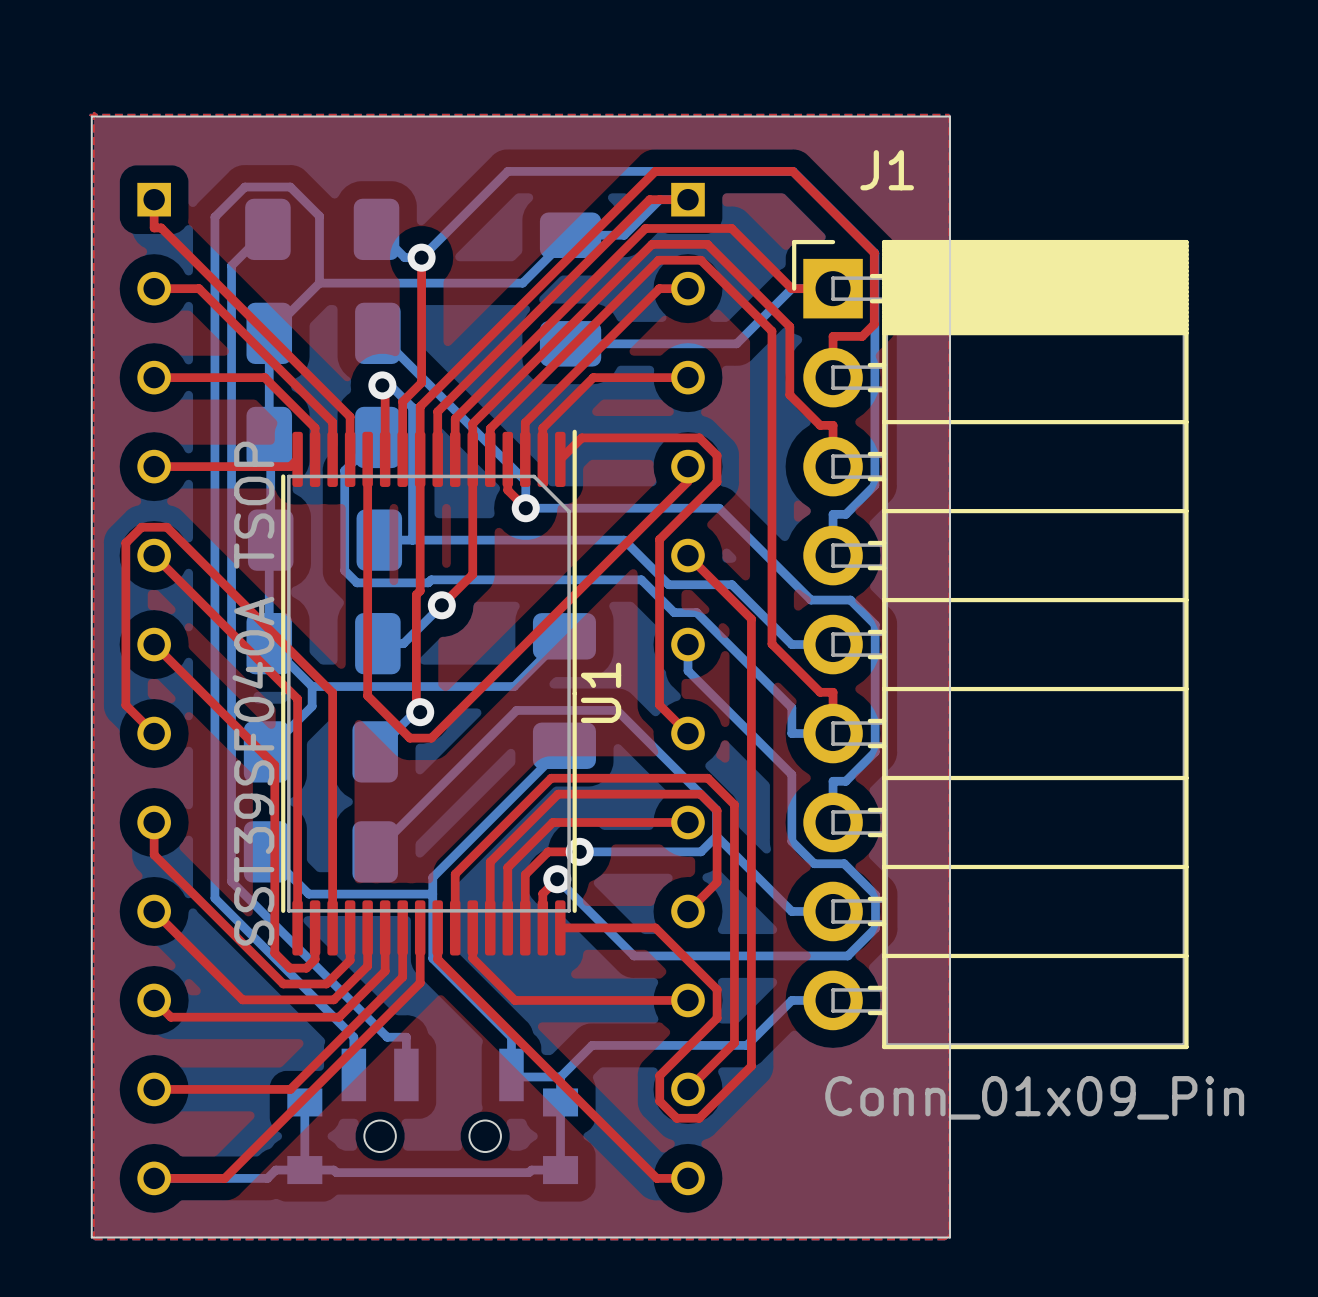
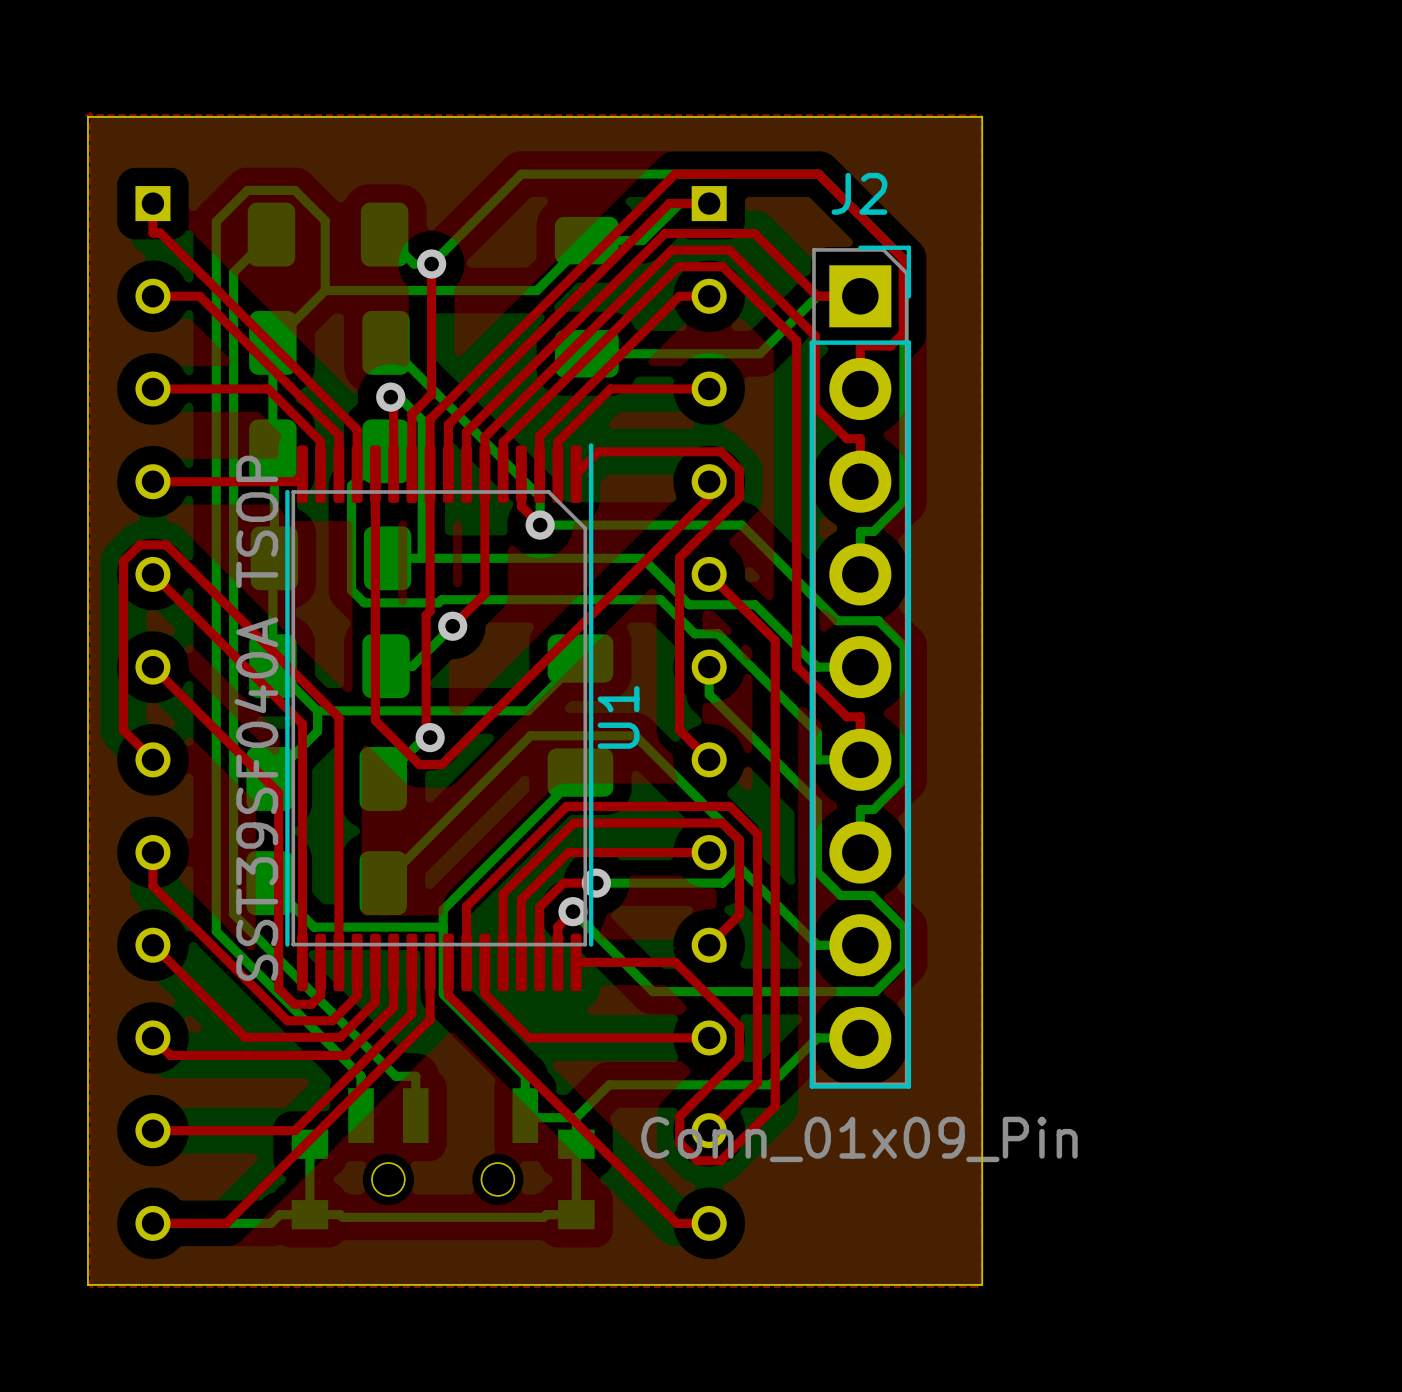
J2: none -> Conn_01x09_Pin (860, 667)
J1: Conn_01x09_Pin (990, 644) -> none

